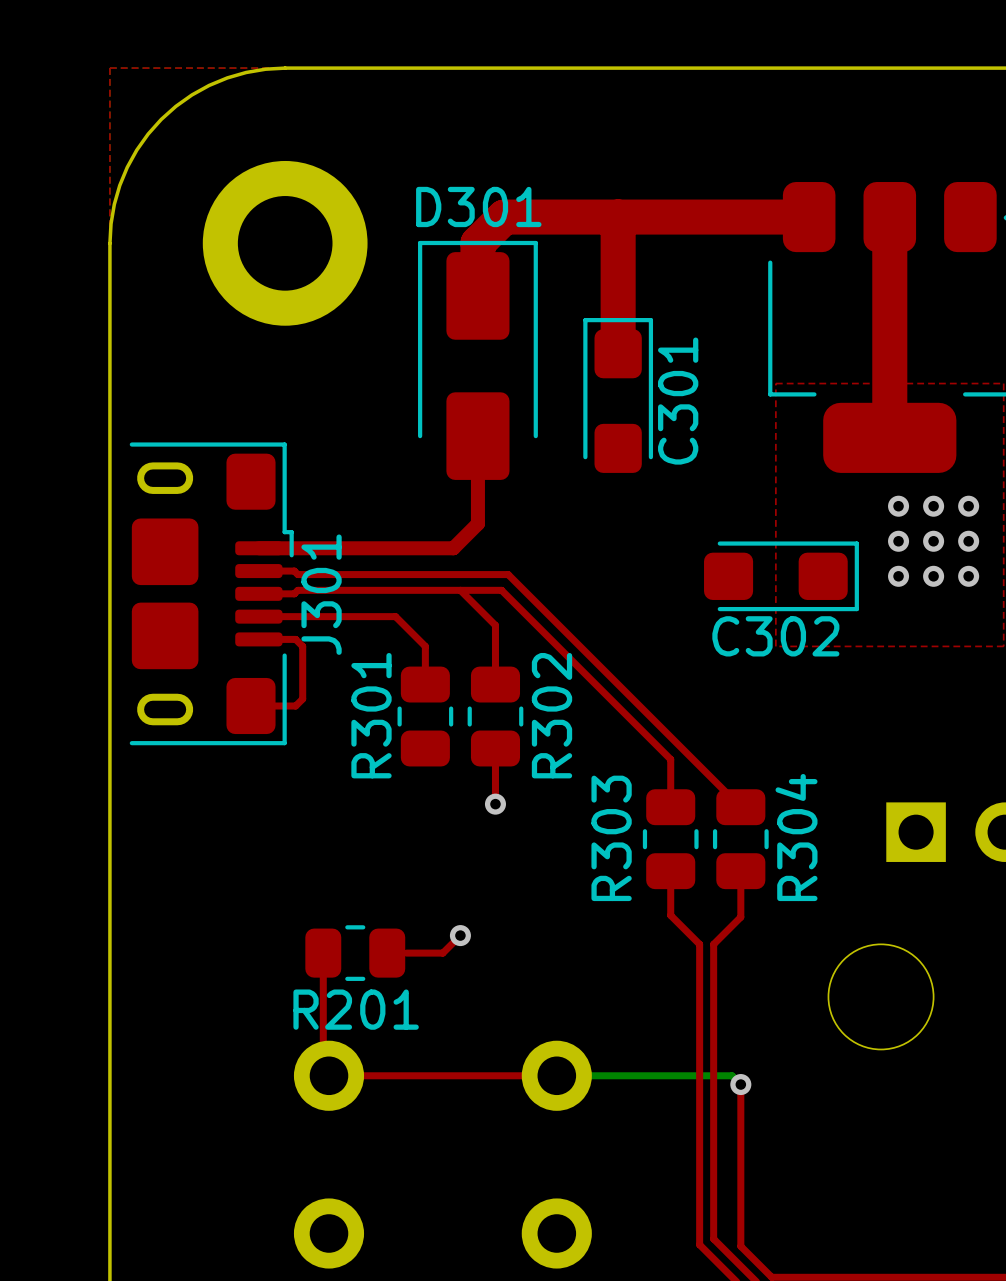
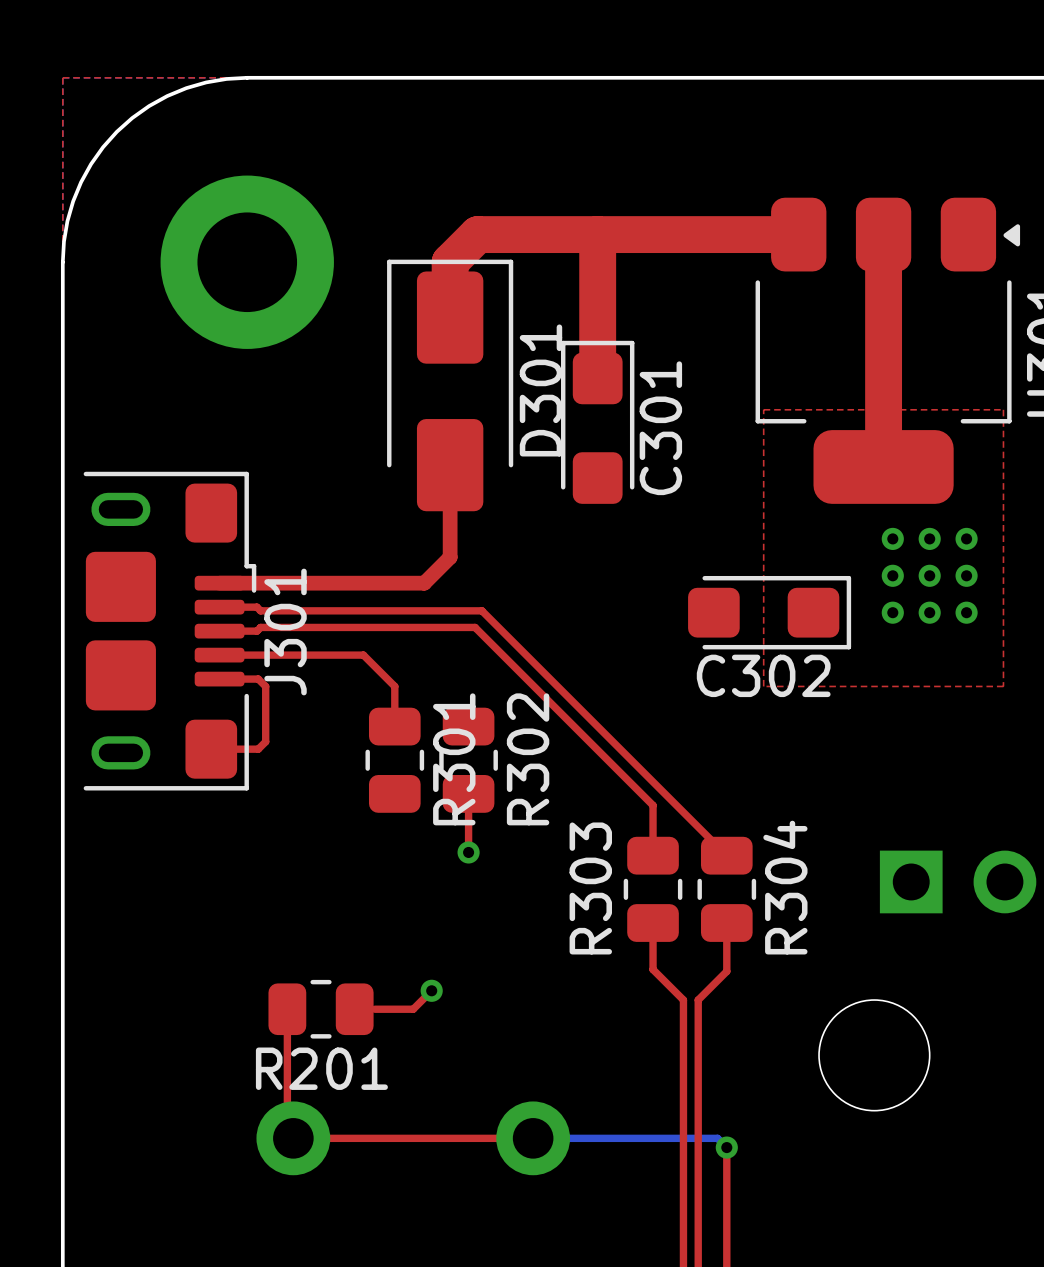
D301 name rotation: 0° (478, 206) -> 90° counterclockwise (540, 390)
D301 name position: D301 (478, 206) -> D301 (540, 390)
top track: (460, 590) (495, 625) (495, 684) -> none
R301 name position: R301 (371, 715) -> R301 (454, 759)

